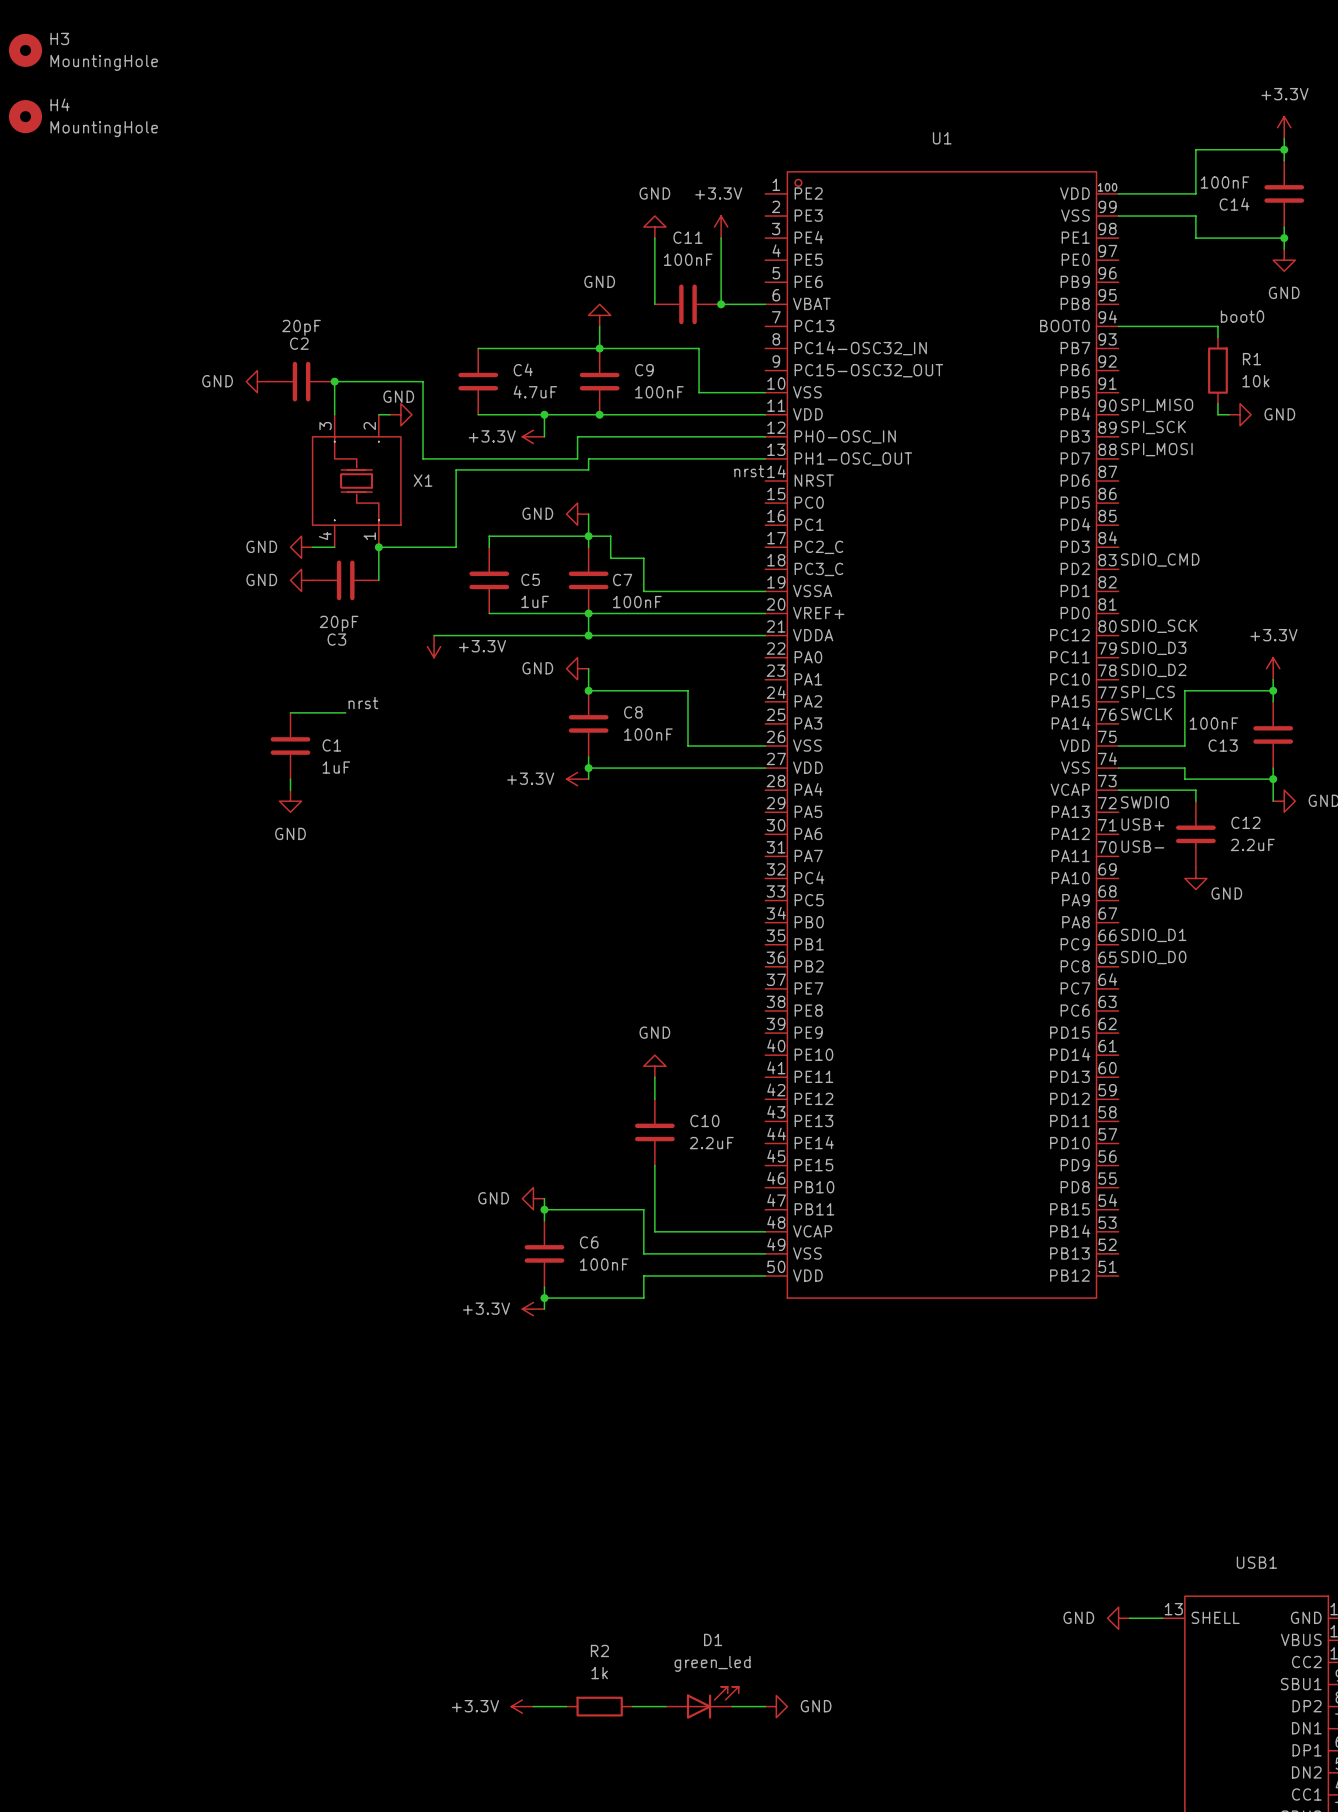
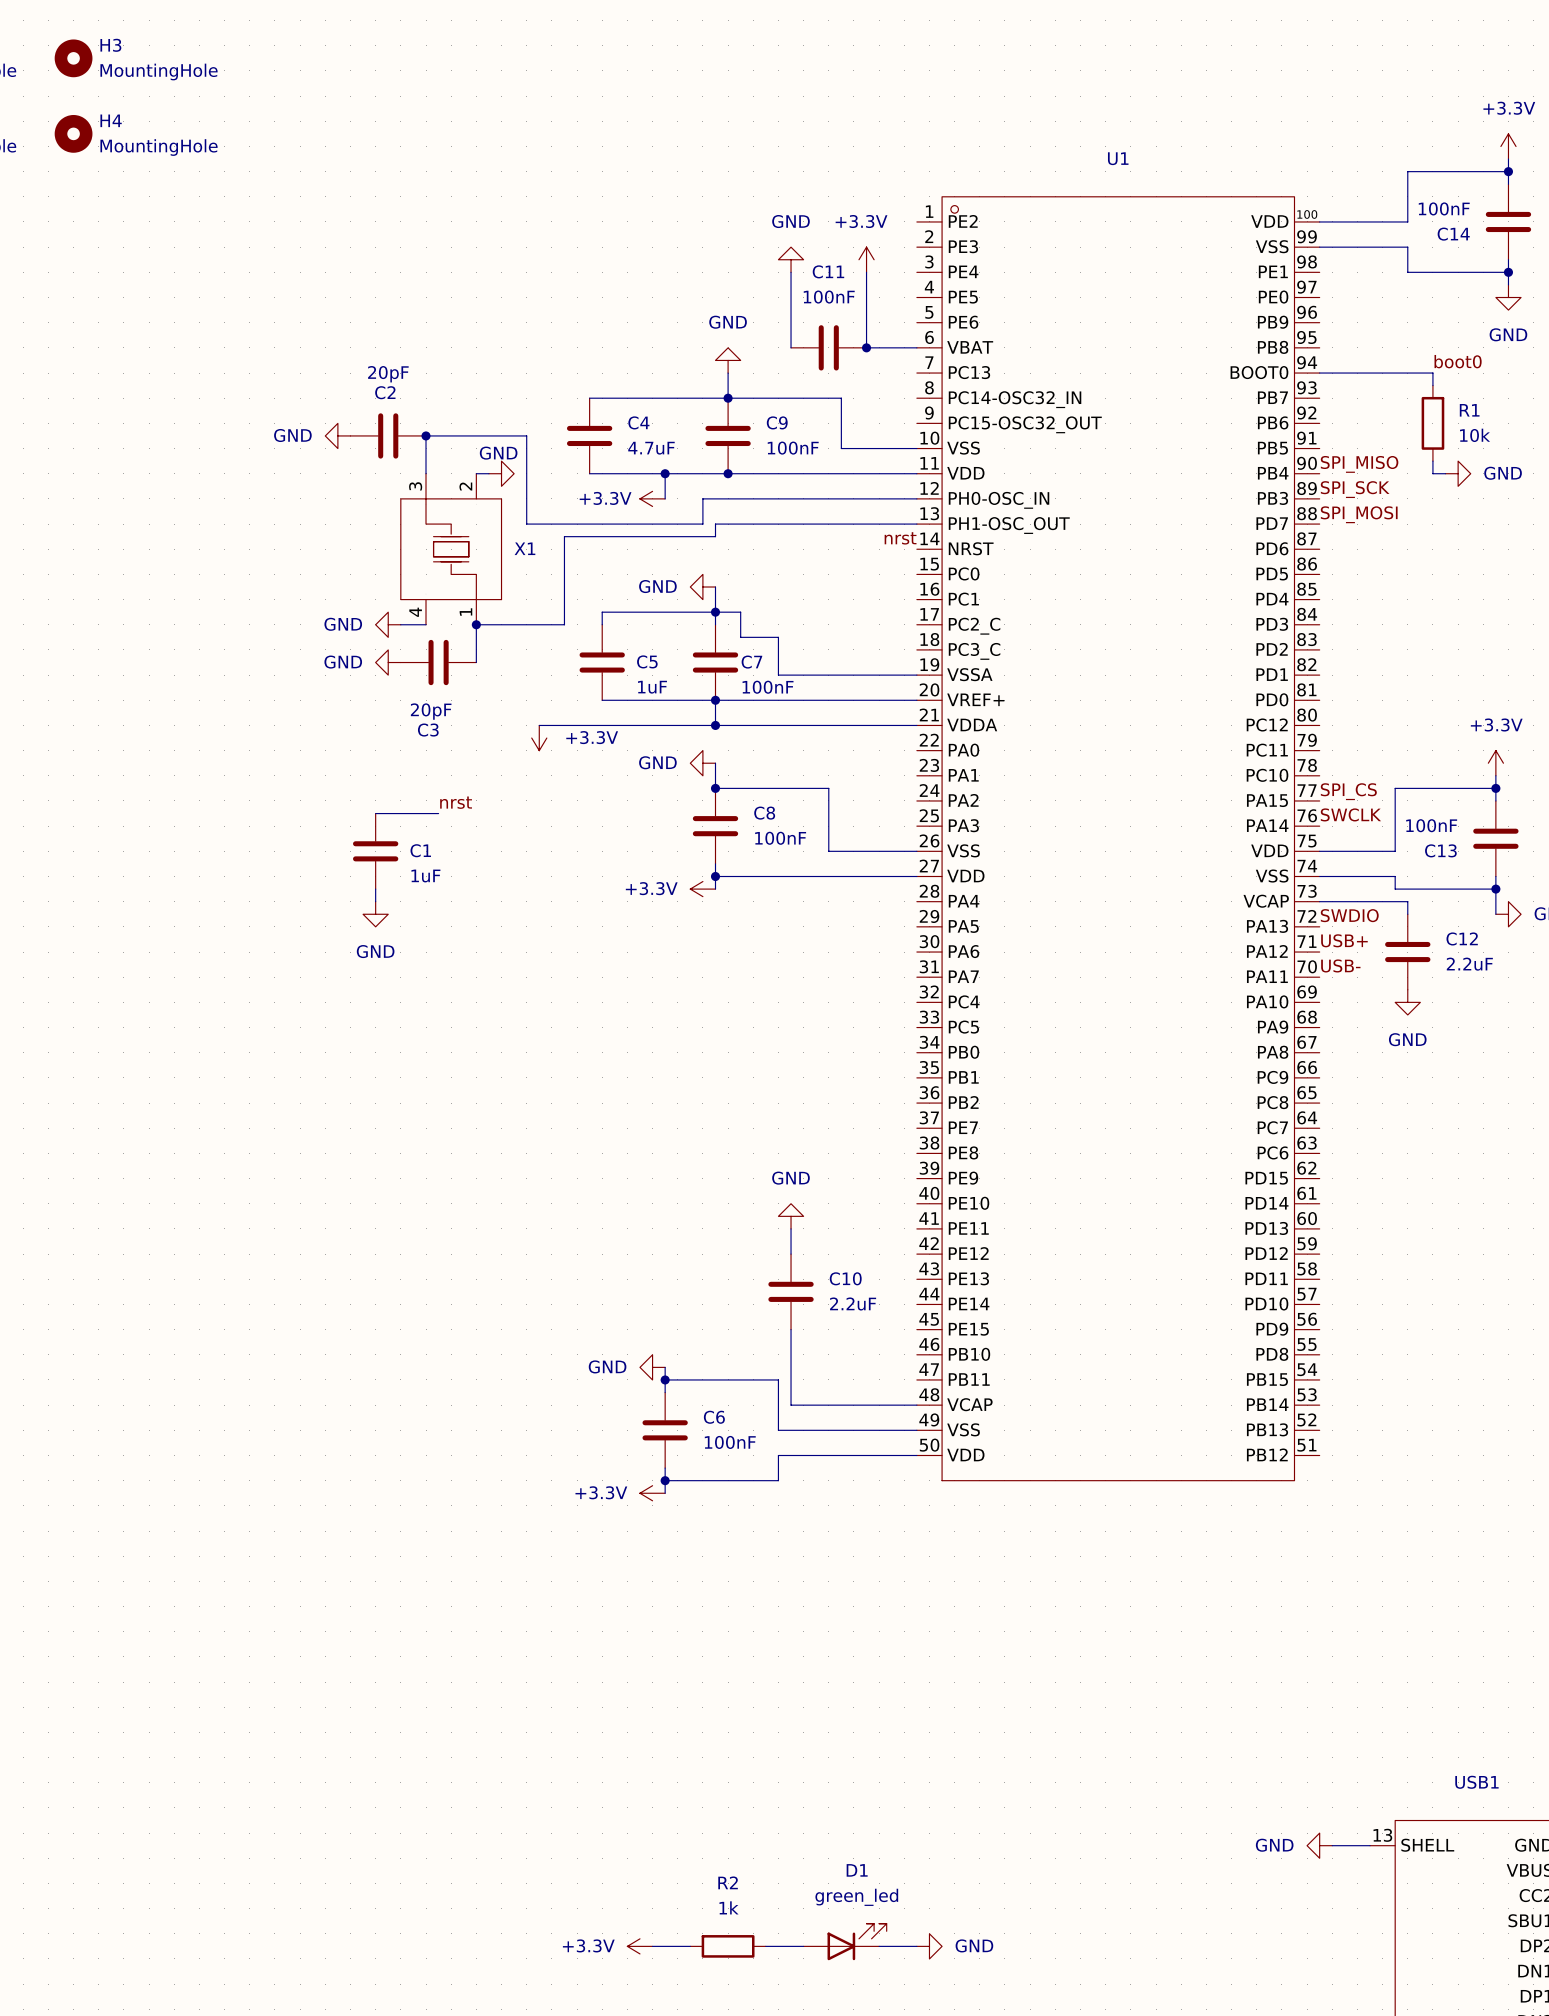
label: SDIO_CMD (1160, 560) -> none
label: SDIO_SCK (1159, 626) -> none
label: SDIO_D3 (1153, 648) -> none
label: SDIO_D2 (1153, 670) -> none
power symbol text position: GND (1226, 893) -> GND (1407, 1039)
label: SDIO_D1 (1153, 935) -> none
label: SDIO_D0 (1153, 957) -> none

